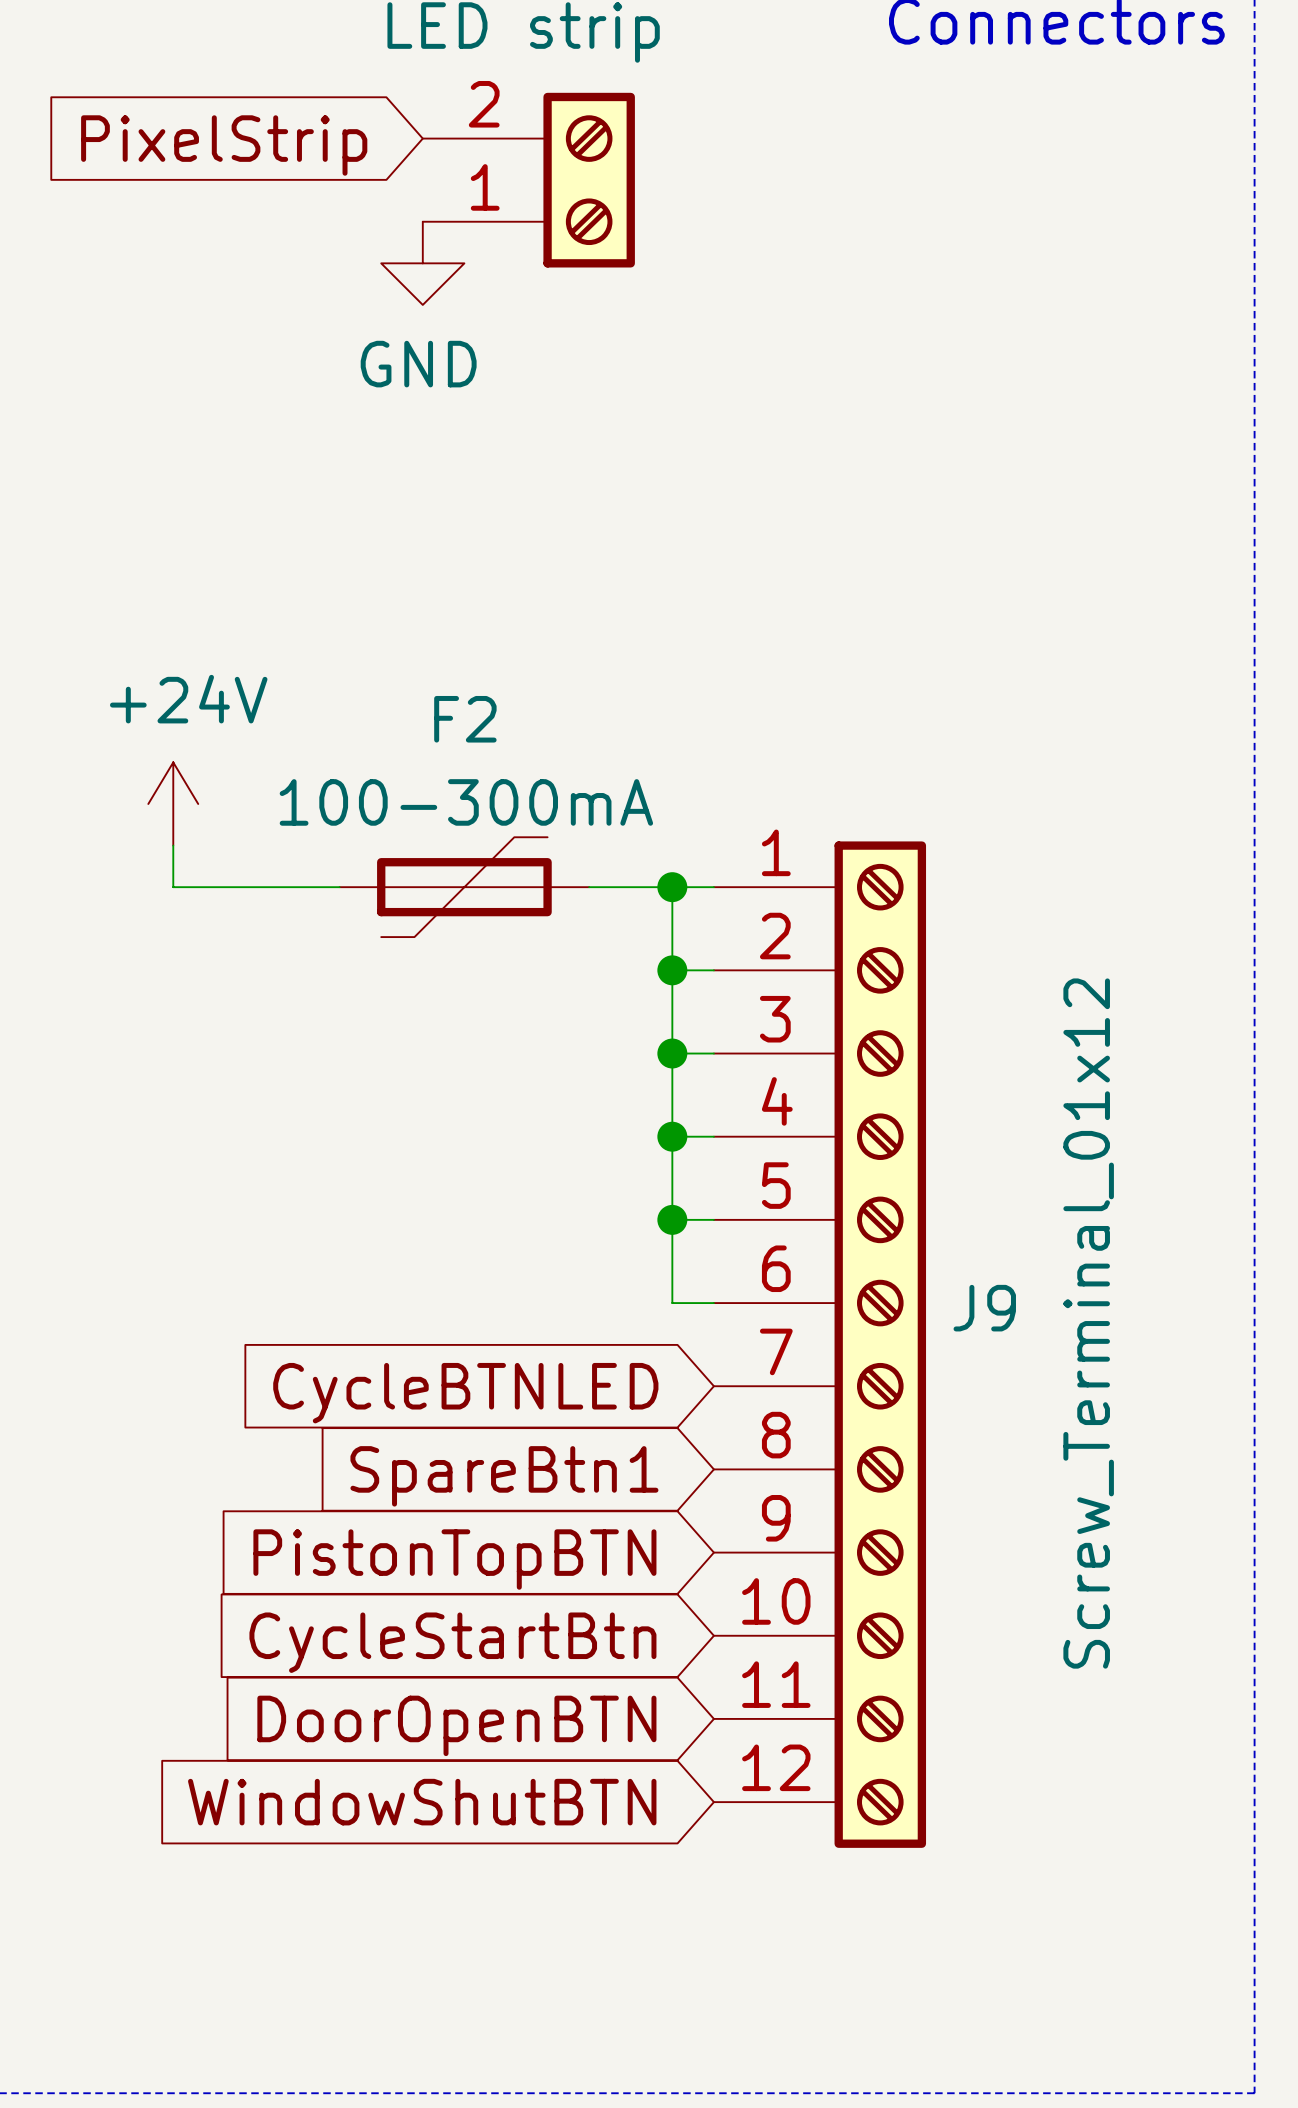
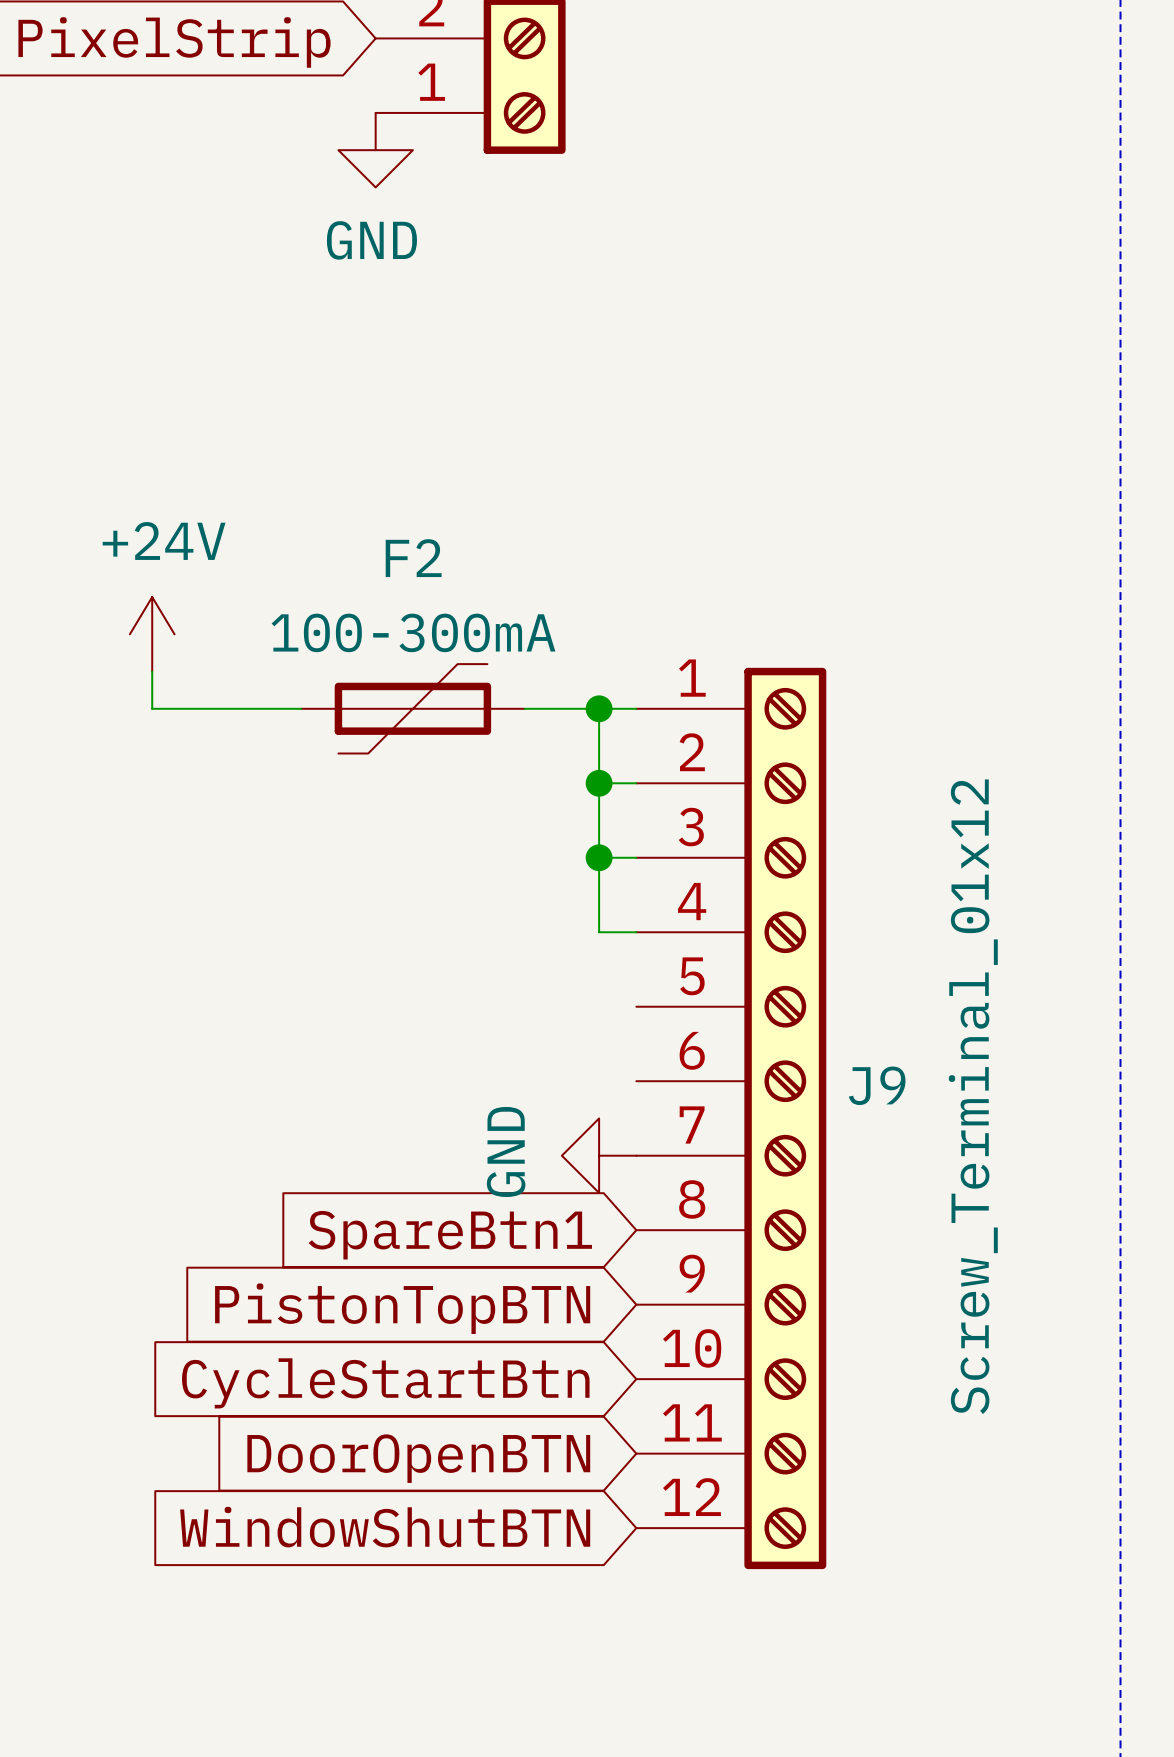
wire: (672, 1136) (672, 1303) (713, 1303) -> none
junction: (672, 1136) -> none
wire: (672, 1219) (713, 1219) -> none
junction: (672, 1219) -> none
power symbol: none -> GND (599, 1155)
global label: CycleBTNLED (465, 1393) -> none

